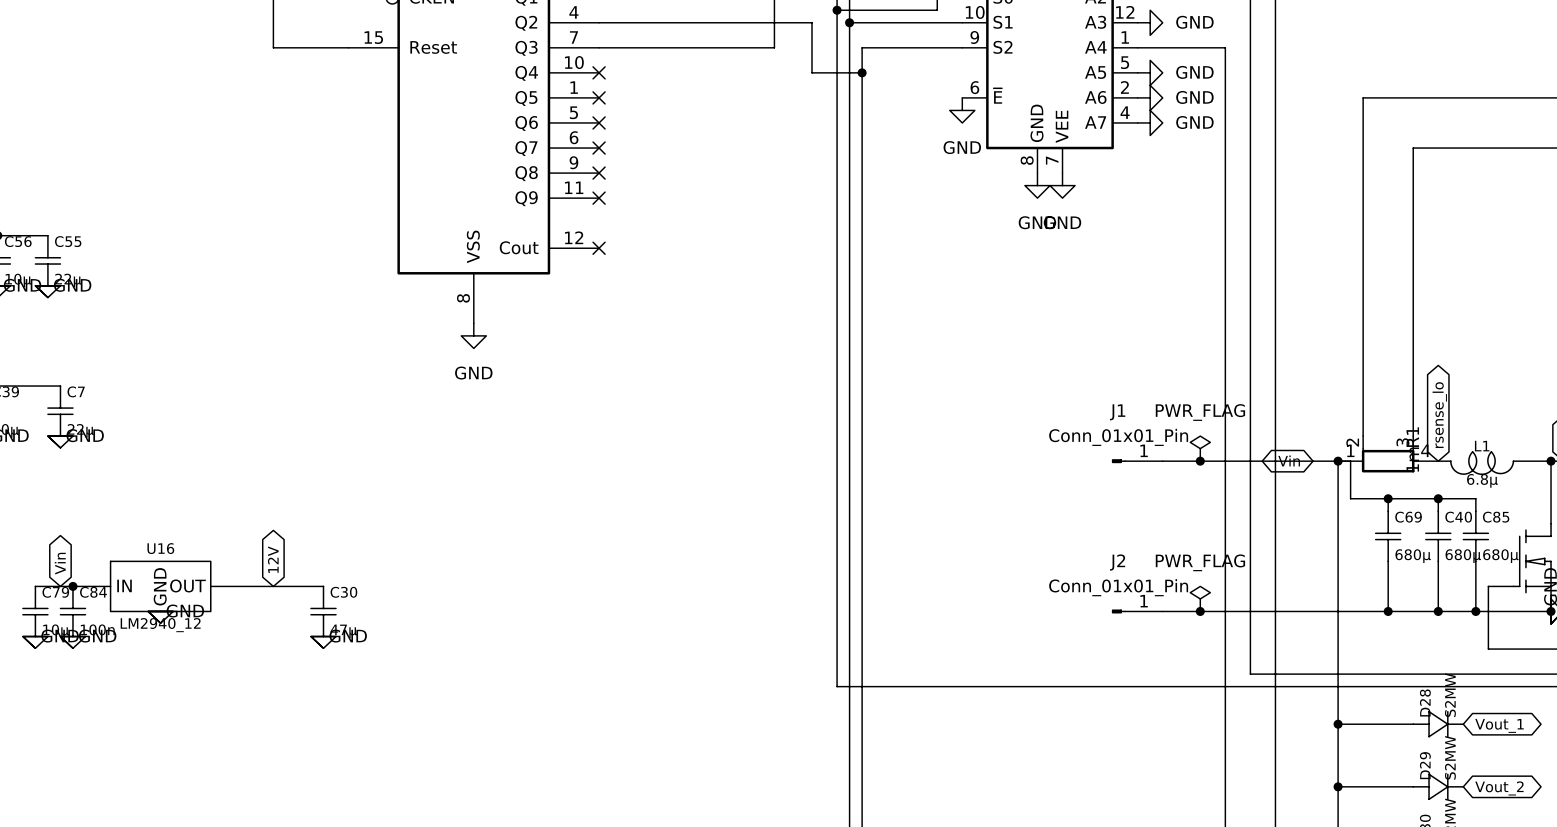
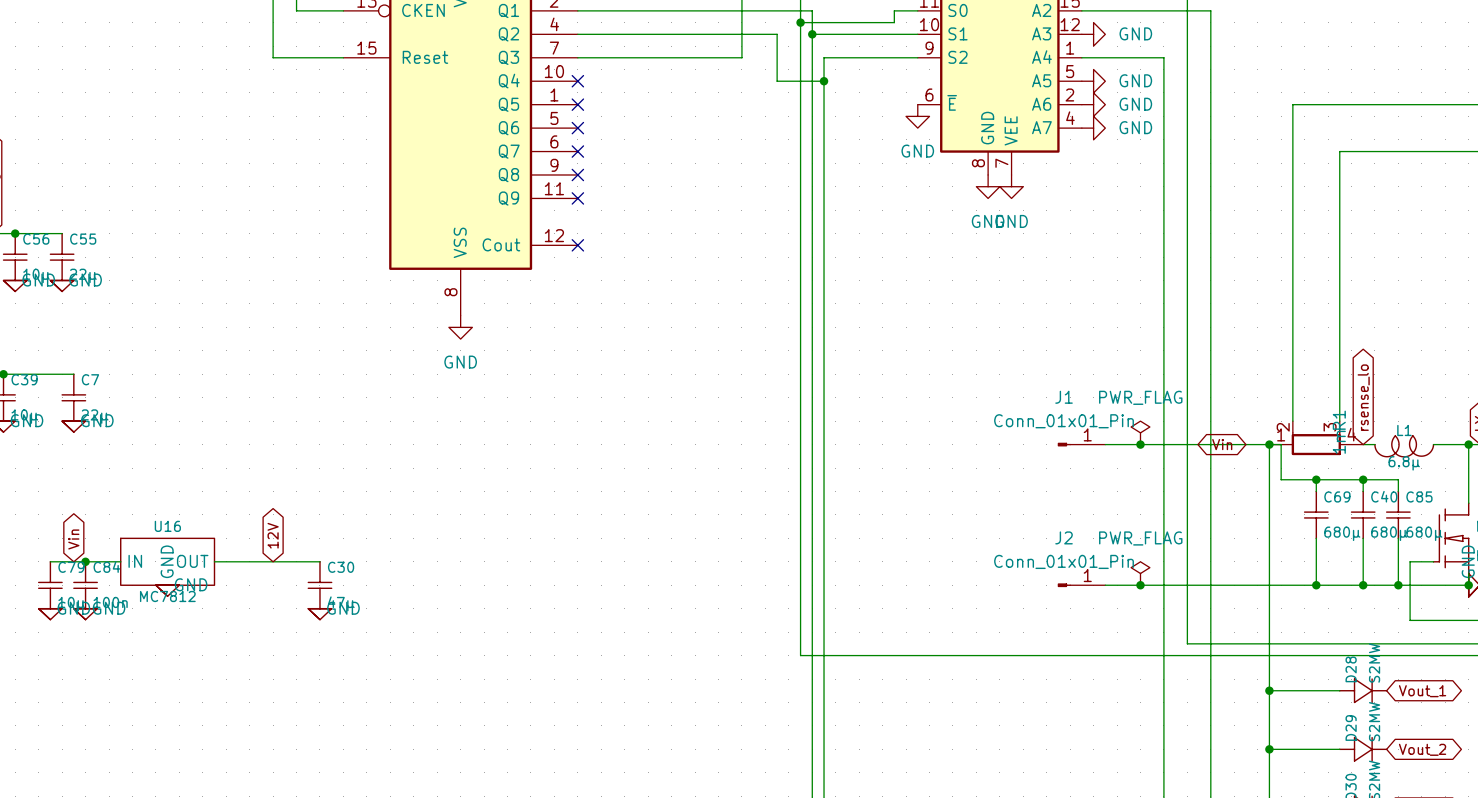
U16 value: LM2940_12 (160, 625) -> MC7812 (167, 596)

